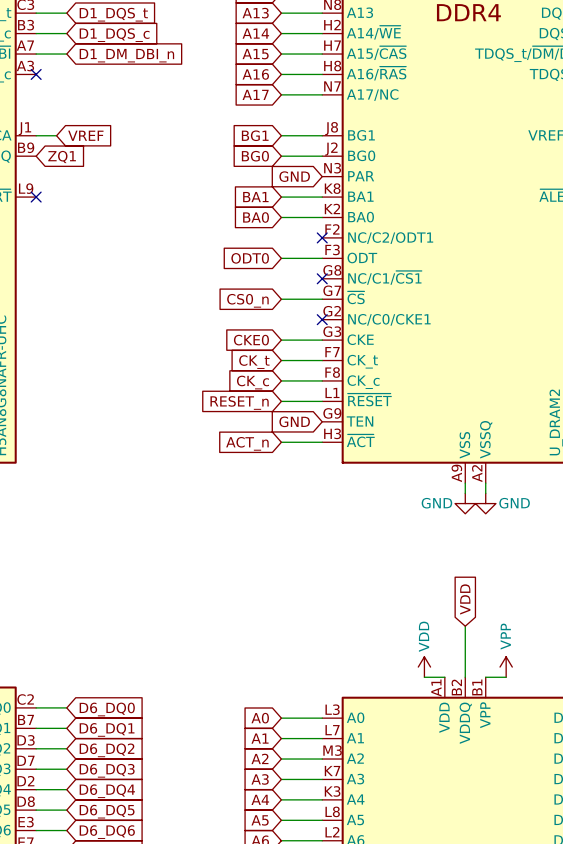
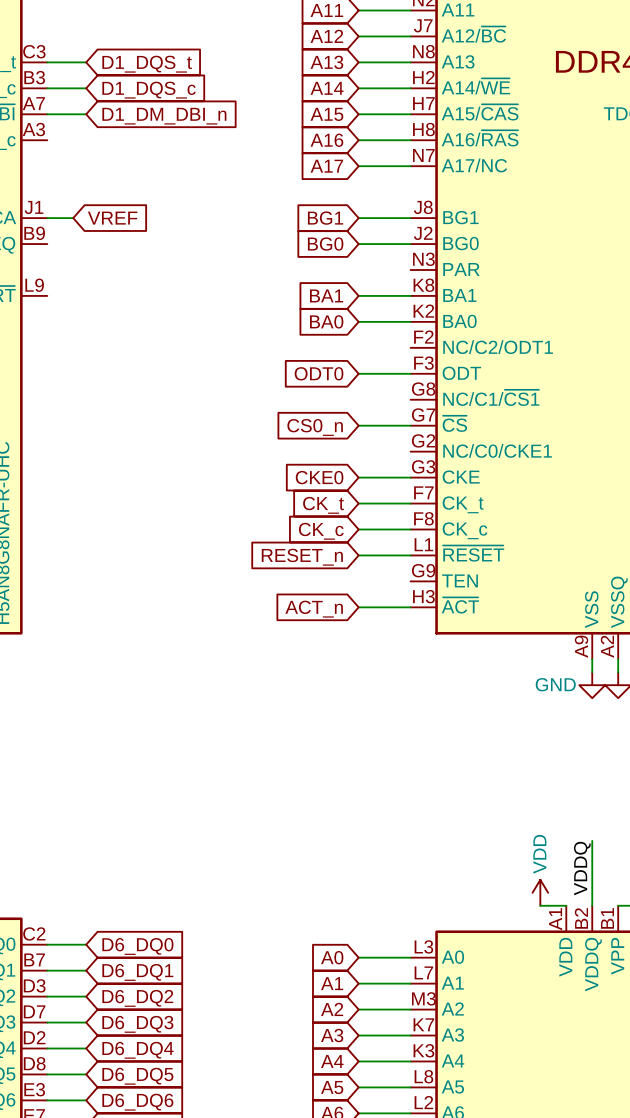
no-connect mark: (36, 74) -> none
global label: ZQ1 (62, 157) -> none
global label: GND (294, 176) -> none
no-connect mark: (36, 197) -> none
no-connect mark: (322, 237) -> none
no-connect mark: (322, 278) -> none
no-connect mark: (322, 319) -> none
global label: GND (294, 421) -> none
global label: VDD (465, 599) -> none
label: none -> VDDQ (582, 868)

